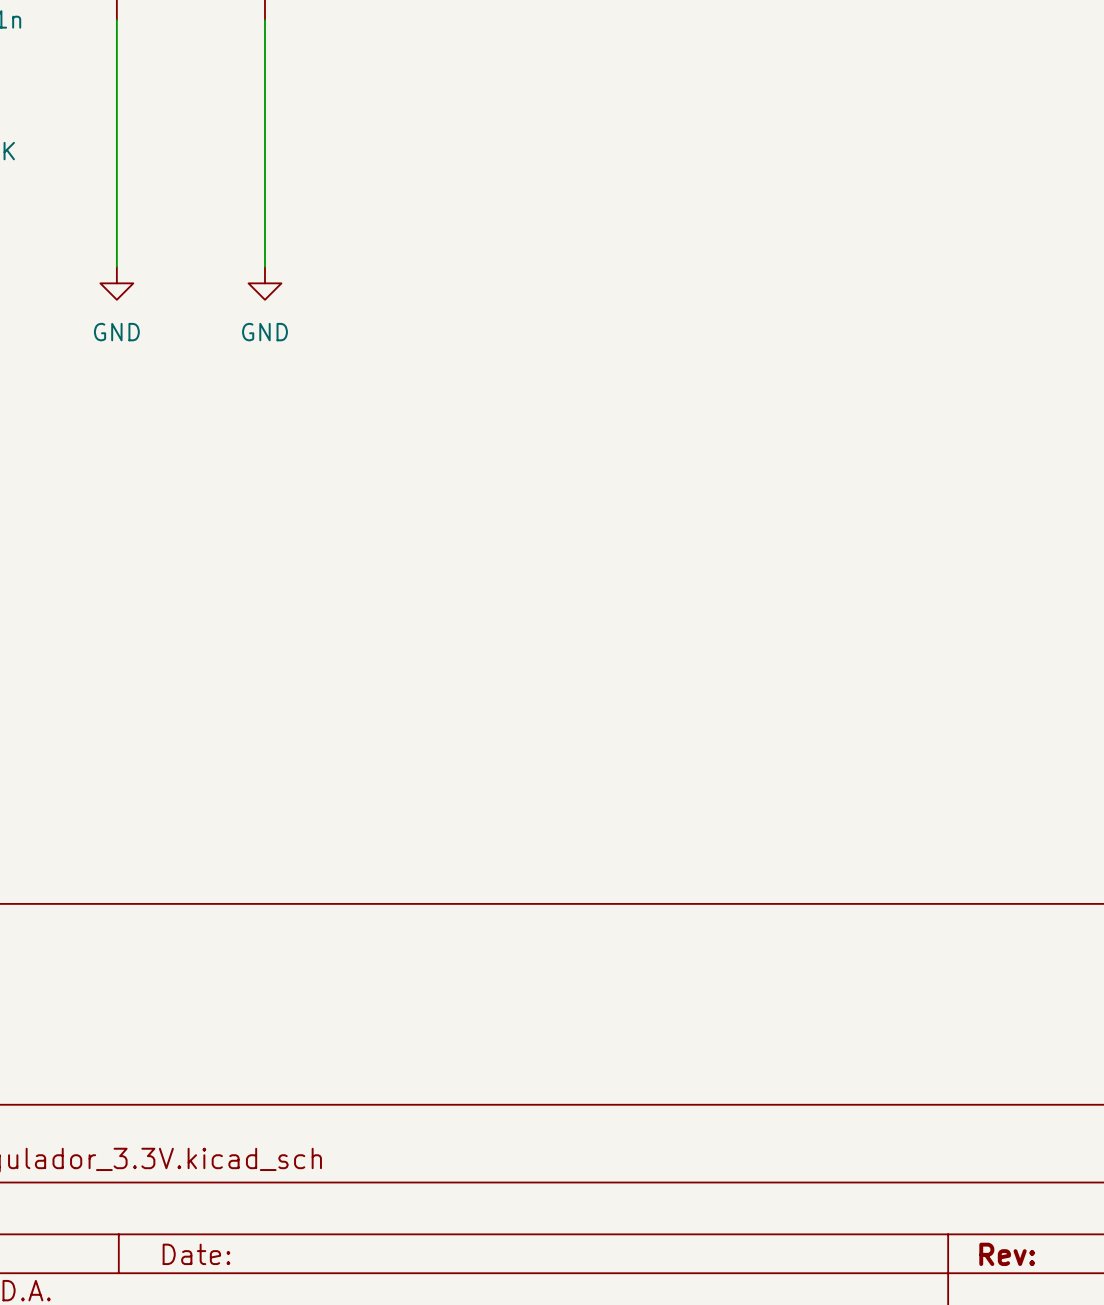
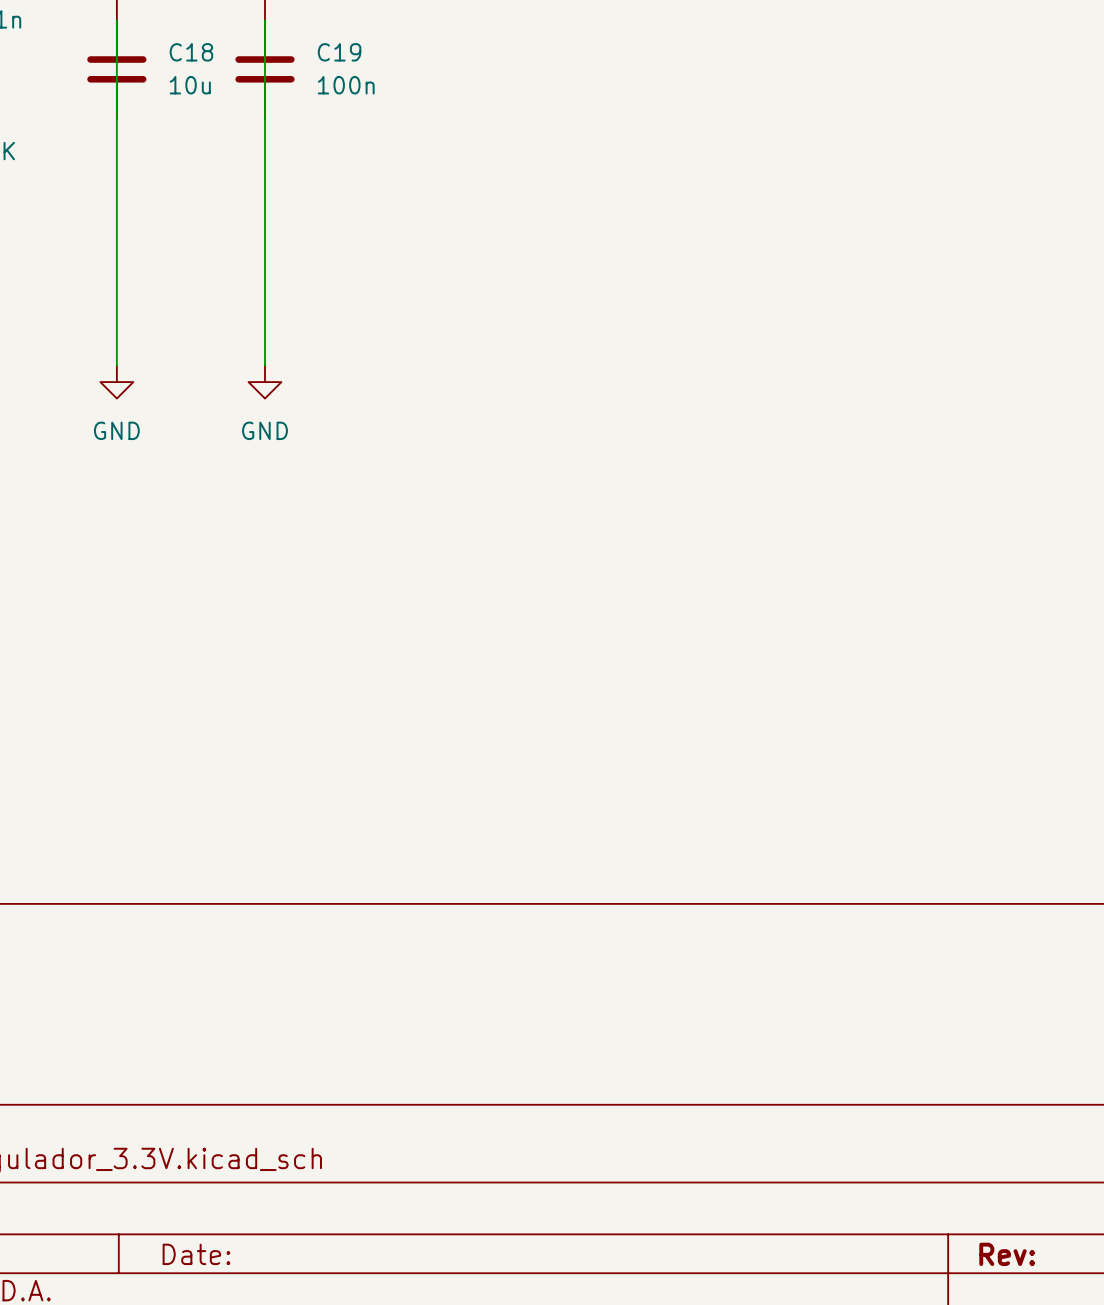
C18: none -> 10u (116, 69)
C19: none -> 100n (264, 69)
wire: none -> (116, 266) (116, 365)
wire: none -> (264, 266) (264, 365)
power symbol: GND (116, 283) -> none
power symbol: GND (264, 283) -> none
power symbol: none -> GND (116, 382)
power symbol: none -> GND (264, 382)

